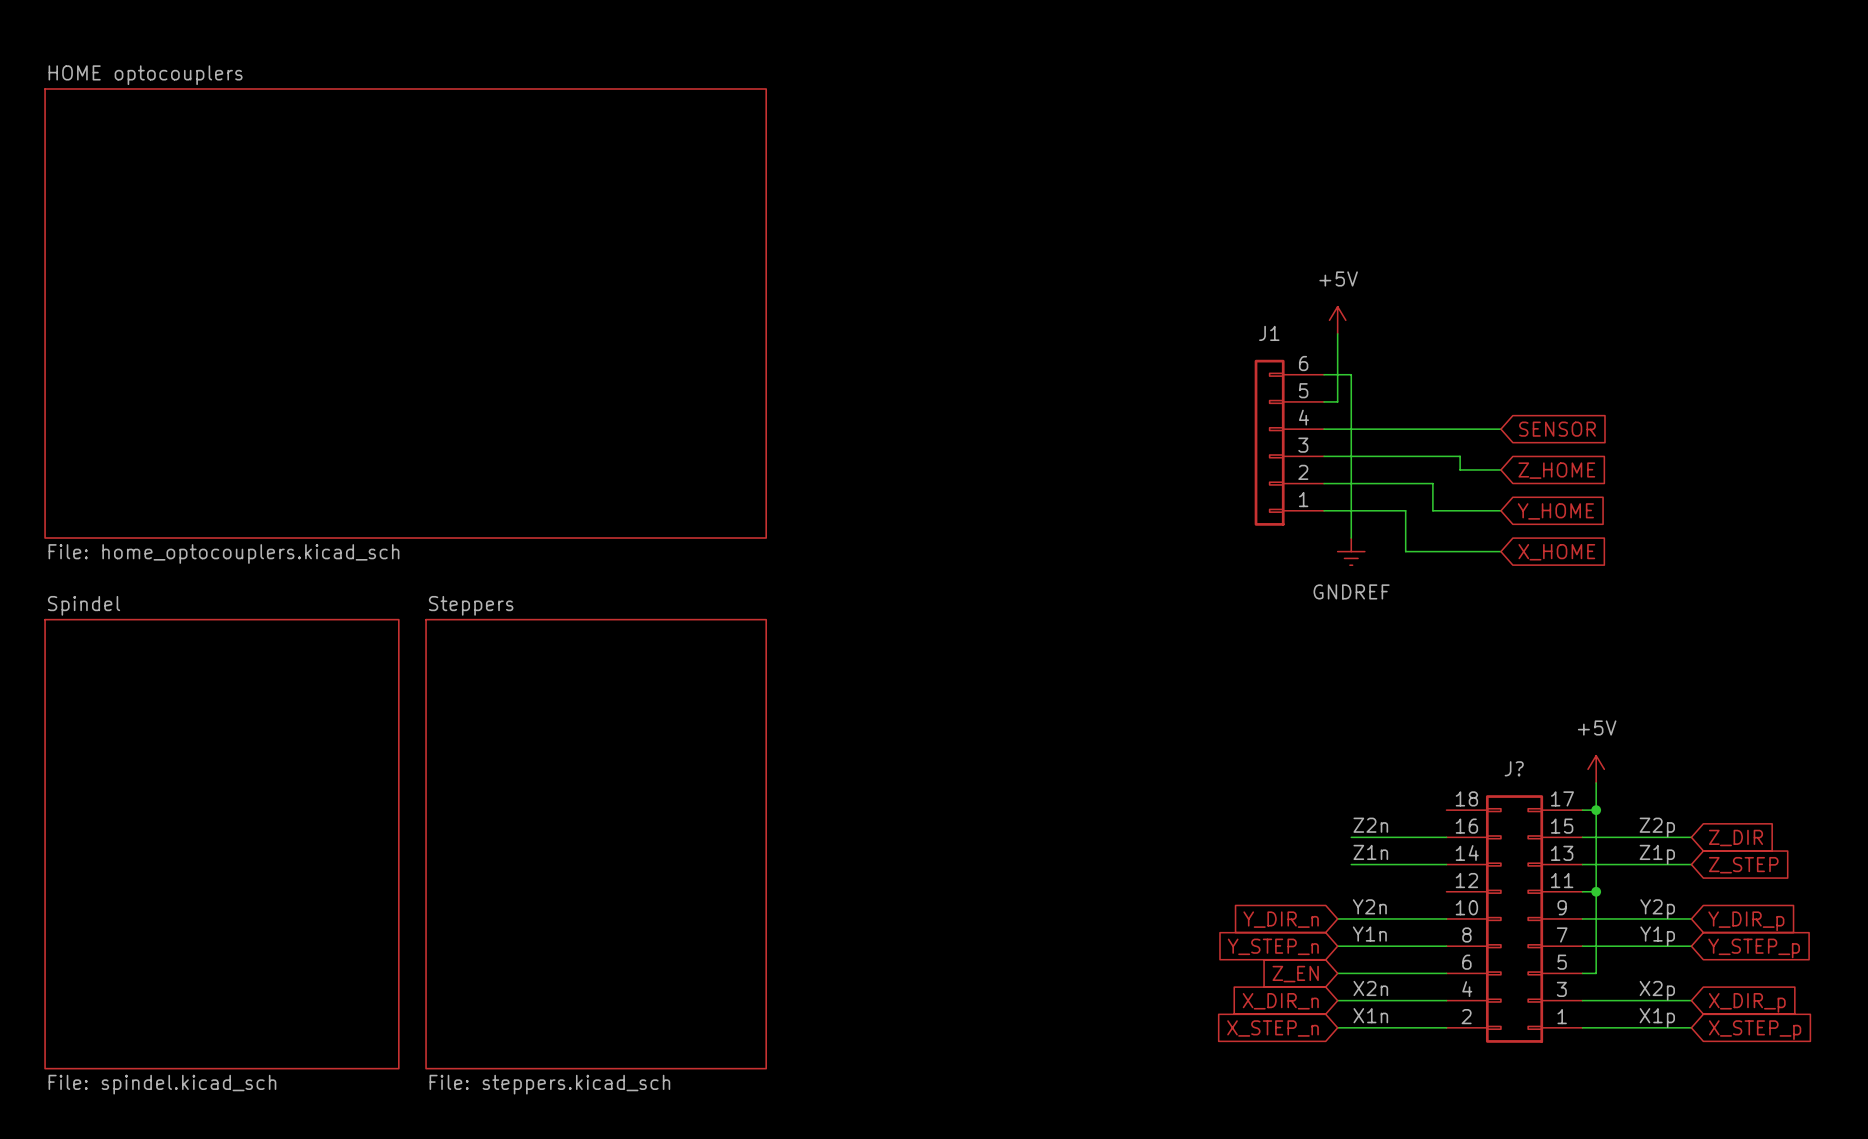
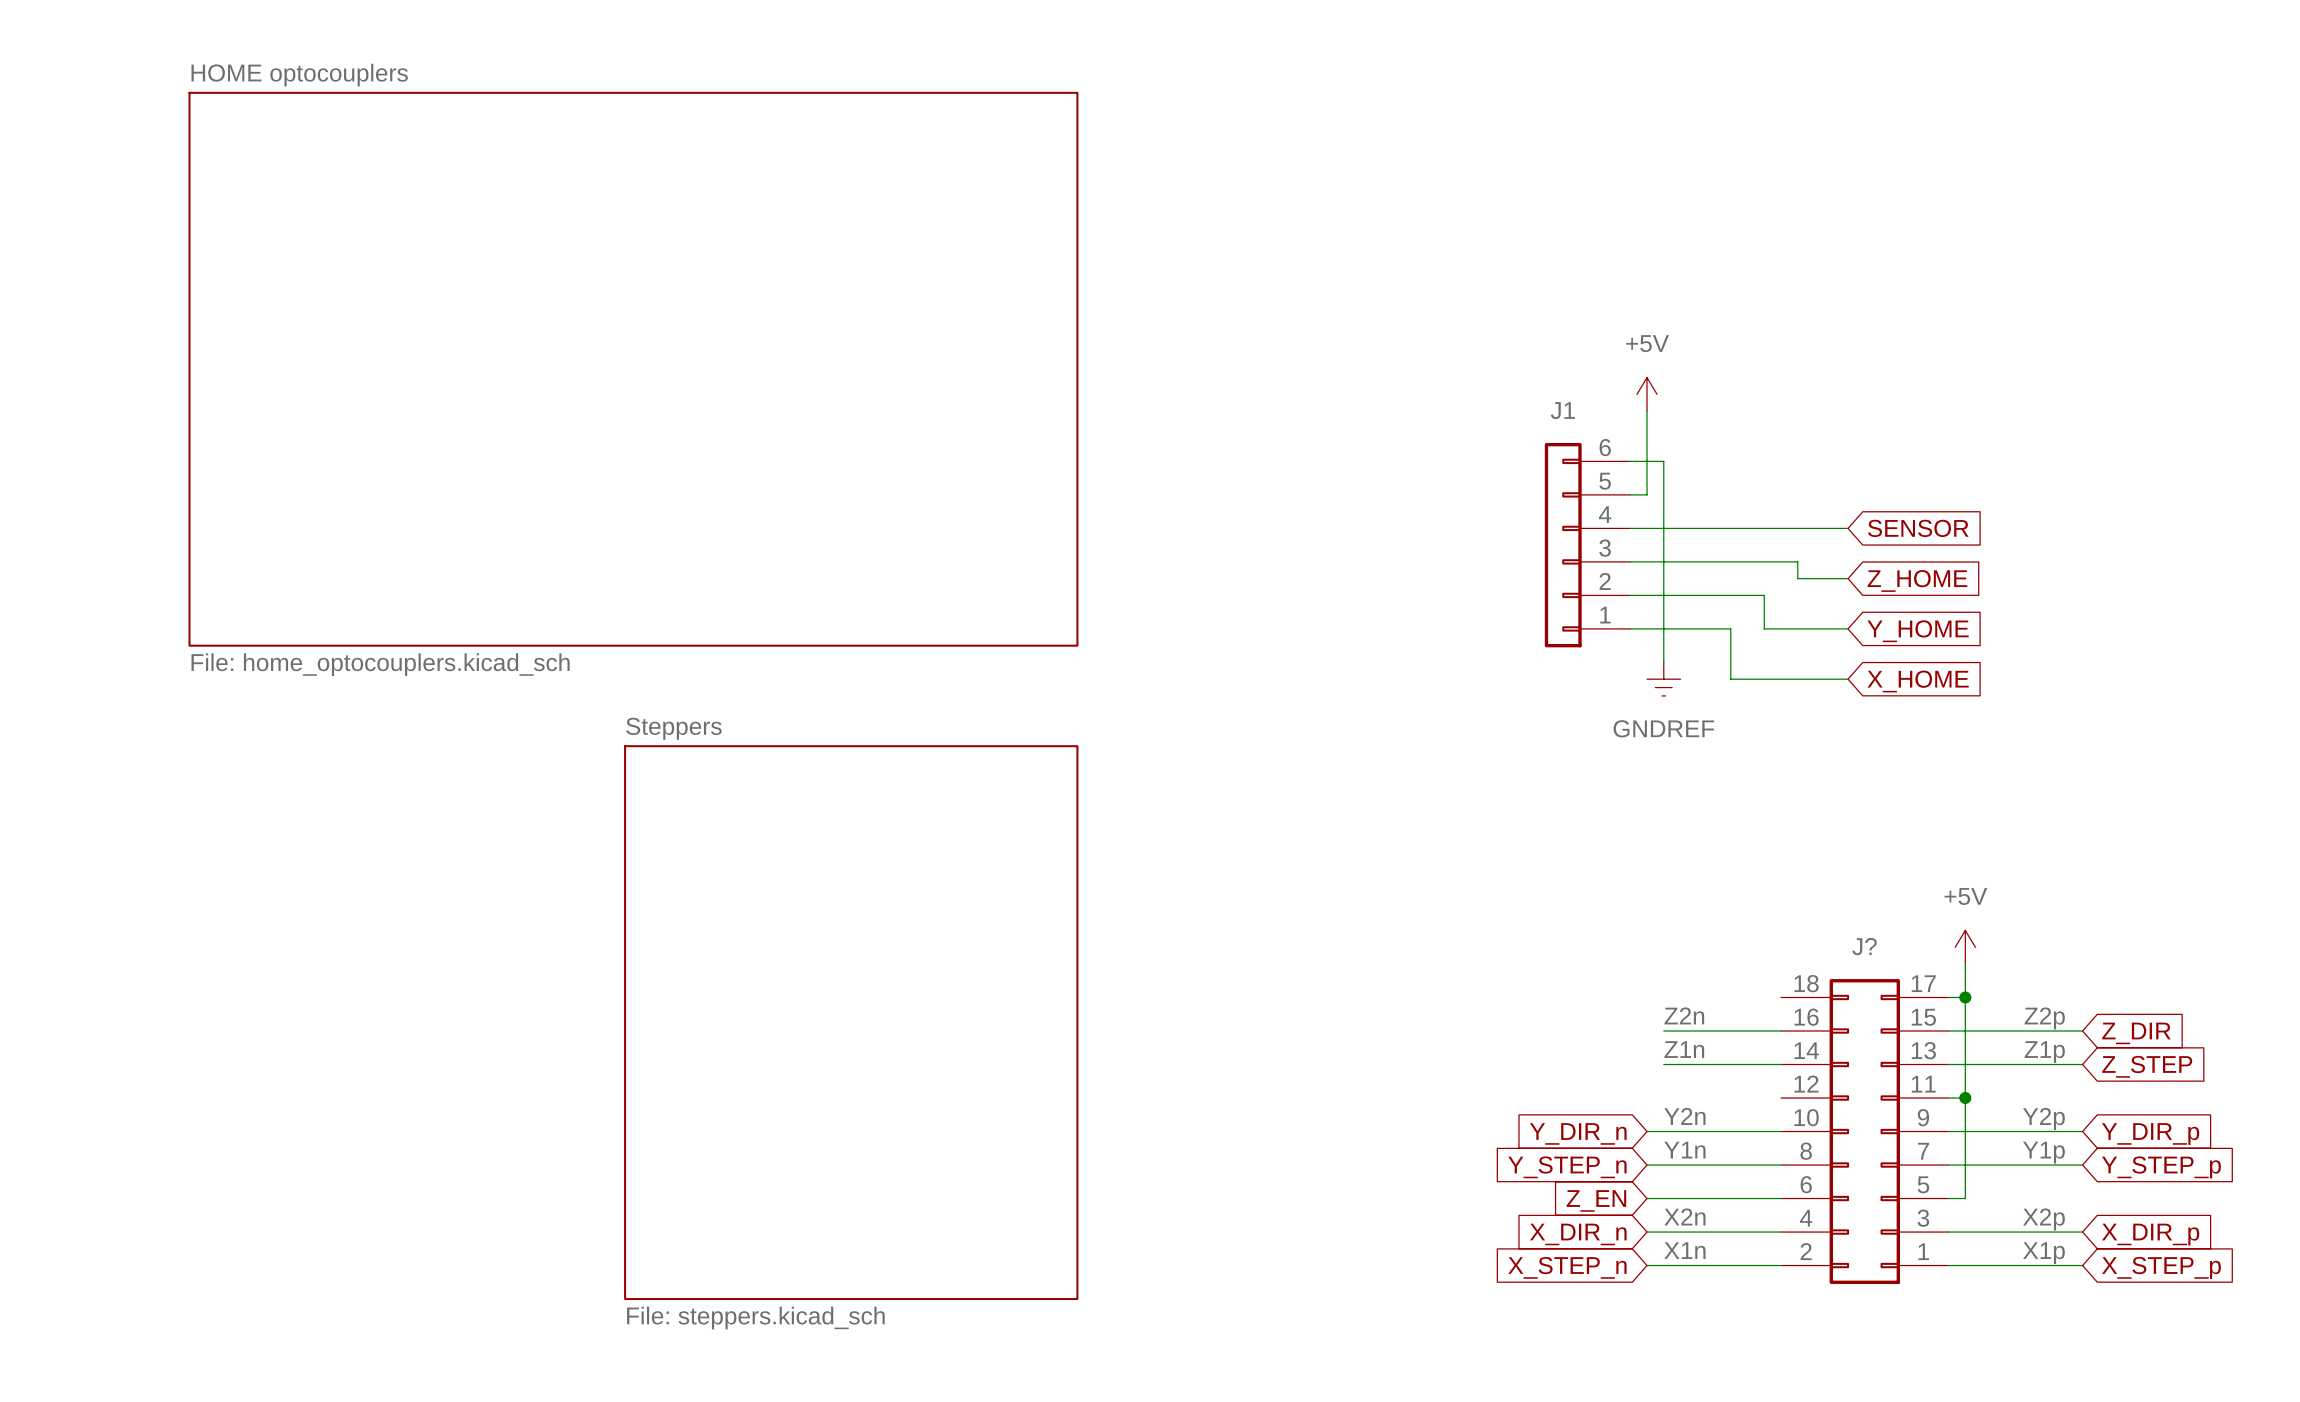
sheet HOME optocouplers position: (405, 313) -> (633, 369)
sheet Steppers: none -> File: steppers.kicad_sch (851, 1022)
sheet Spindel: File: spindel.kicad_sch (221, 844) -> none
sheet Steppers: File: steppers.kicad_sch (596, 844) -> none

